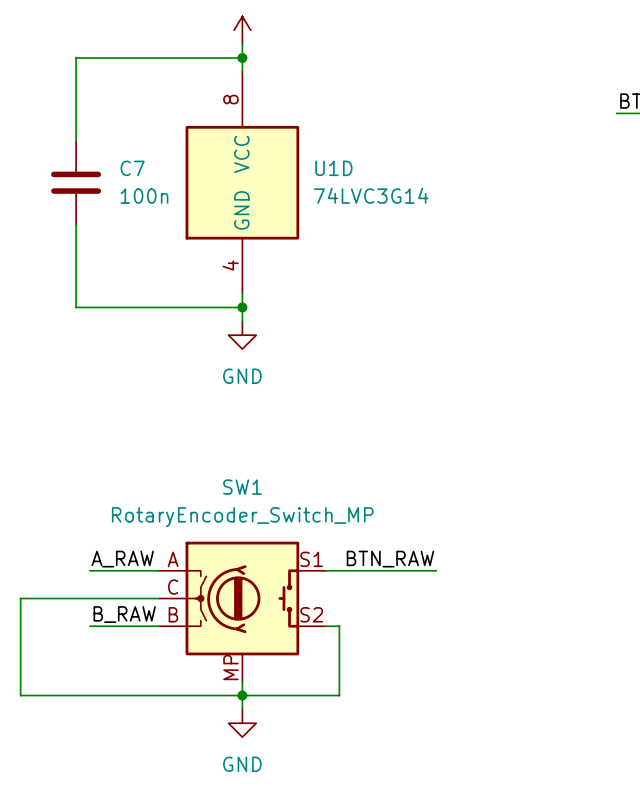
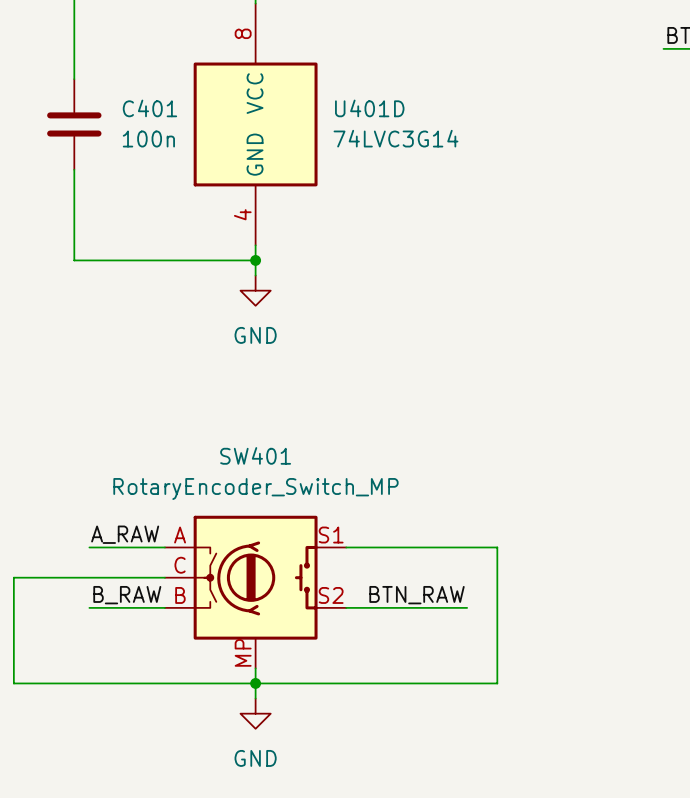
C7 name: C7 (132, 168) -> C401 (149, 108)
U1D name: U1D (333, 168) -> U401D (369, 108)
SW1 name: SW1 (242, 487) -> SW401 (255, 455)
label position: BTN_RAW (390, 559) -> BTN_RAW (417, 595)
wire: (339, 626) (339, 695) -> (467, 547) (497, 547) (497, 683) (361, 683)
wire: none -> (361, 607) (467, 607)

